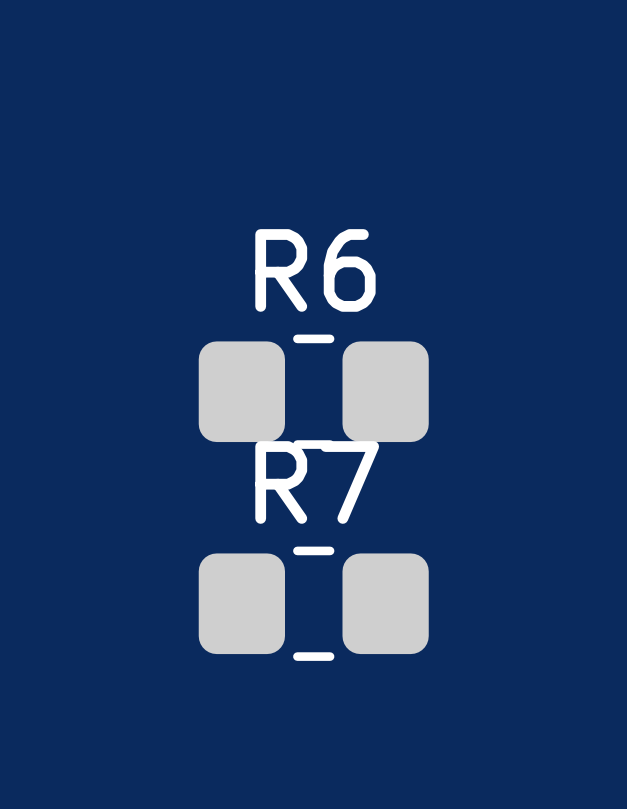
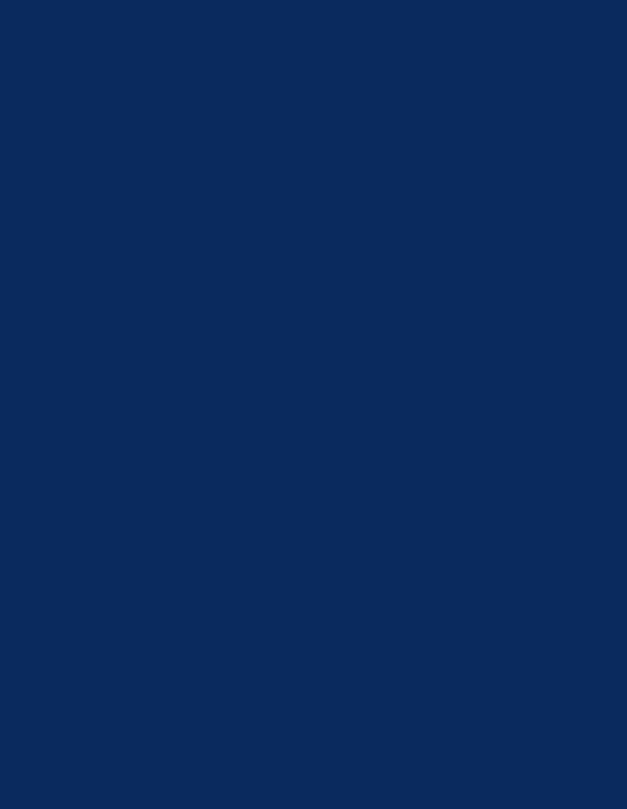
R6: (313, 391) -> none
R7: (313, 603) -> none

